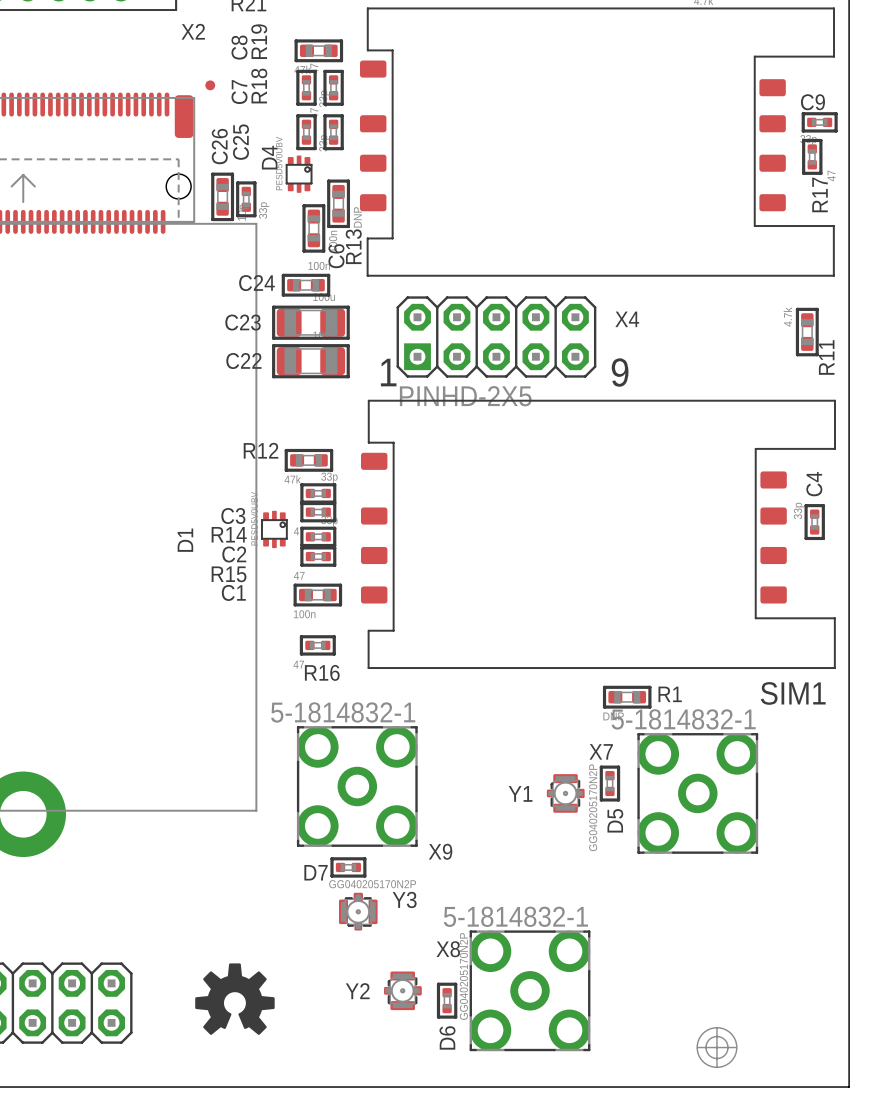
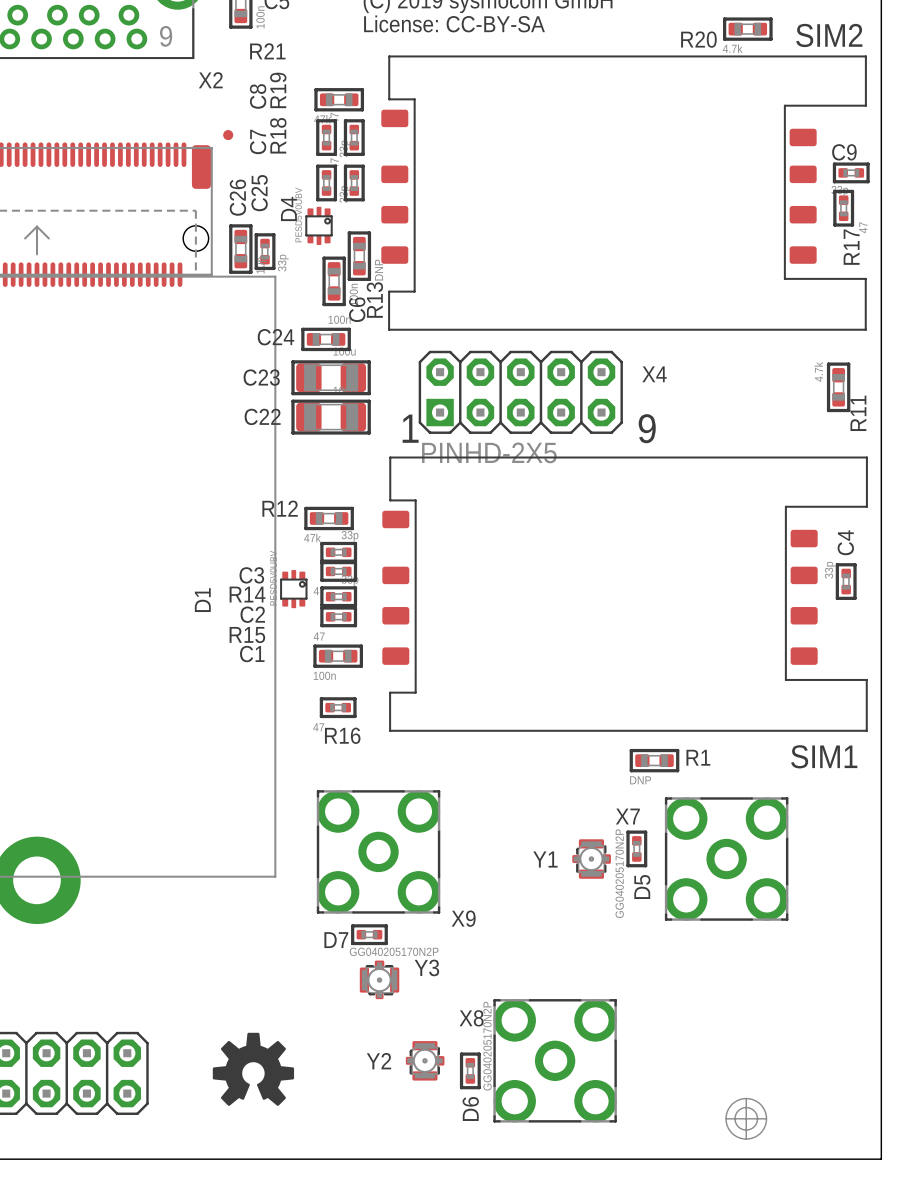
X9 value: 5-1814832-1 (343, 712) -> none
X7 value: 5-1814832-1 (683, 719) -> none
X8 value: 5-1814832-1 (515, 916) -> none

